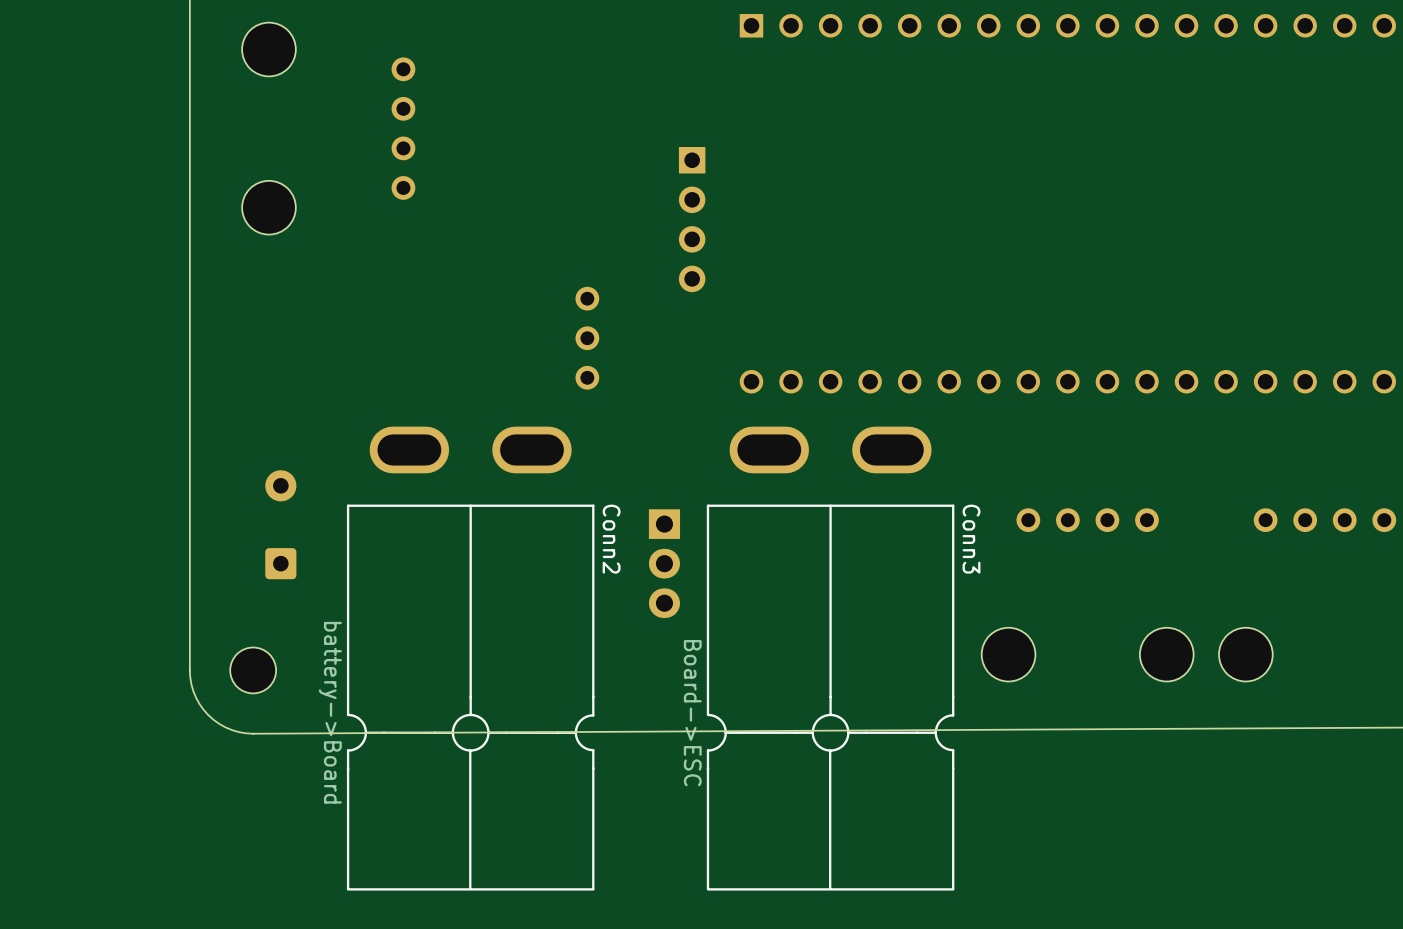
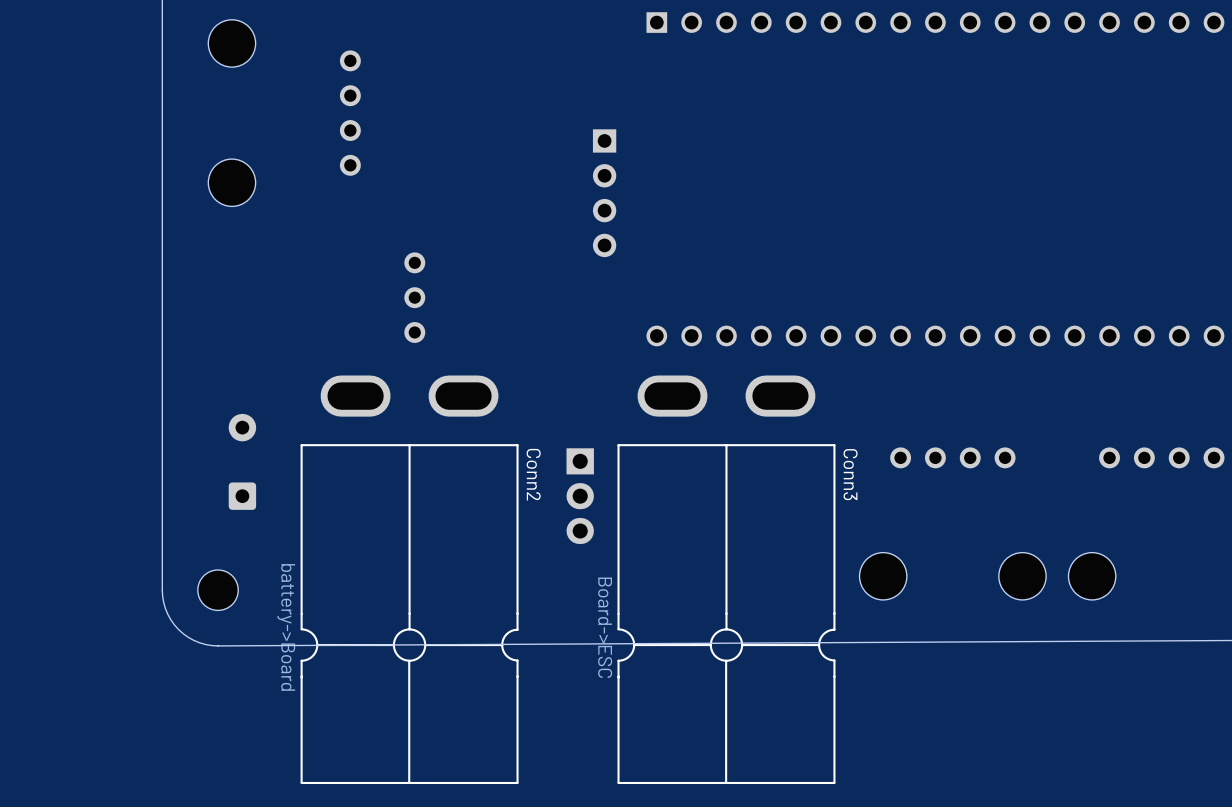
part position: (587, 338) -> (414, 297)

